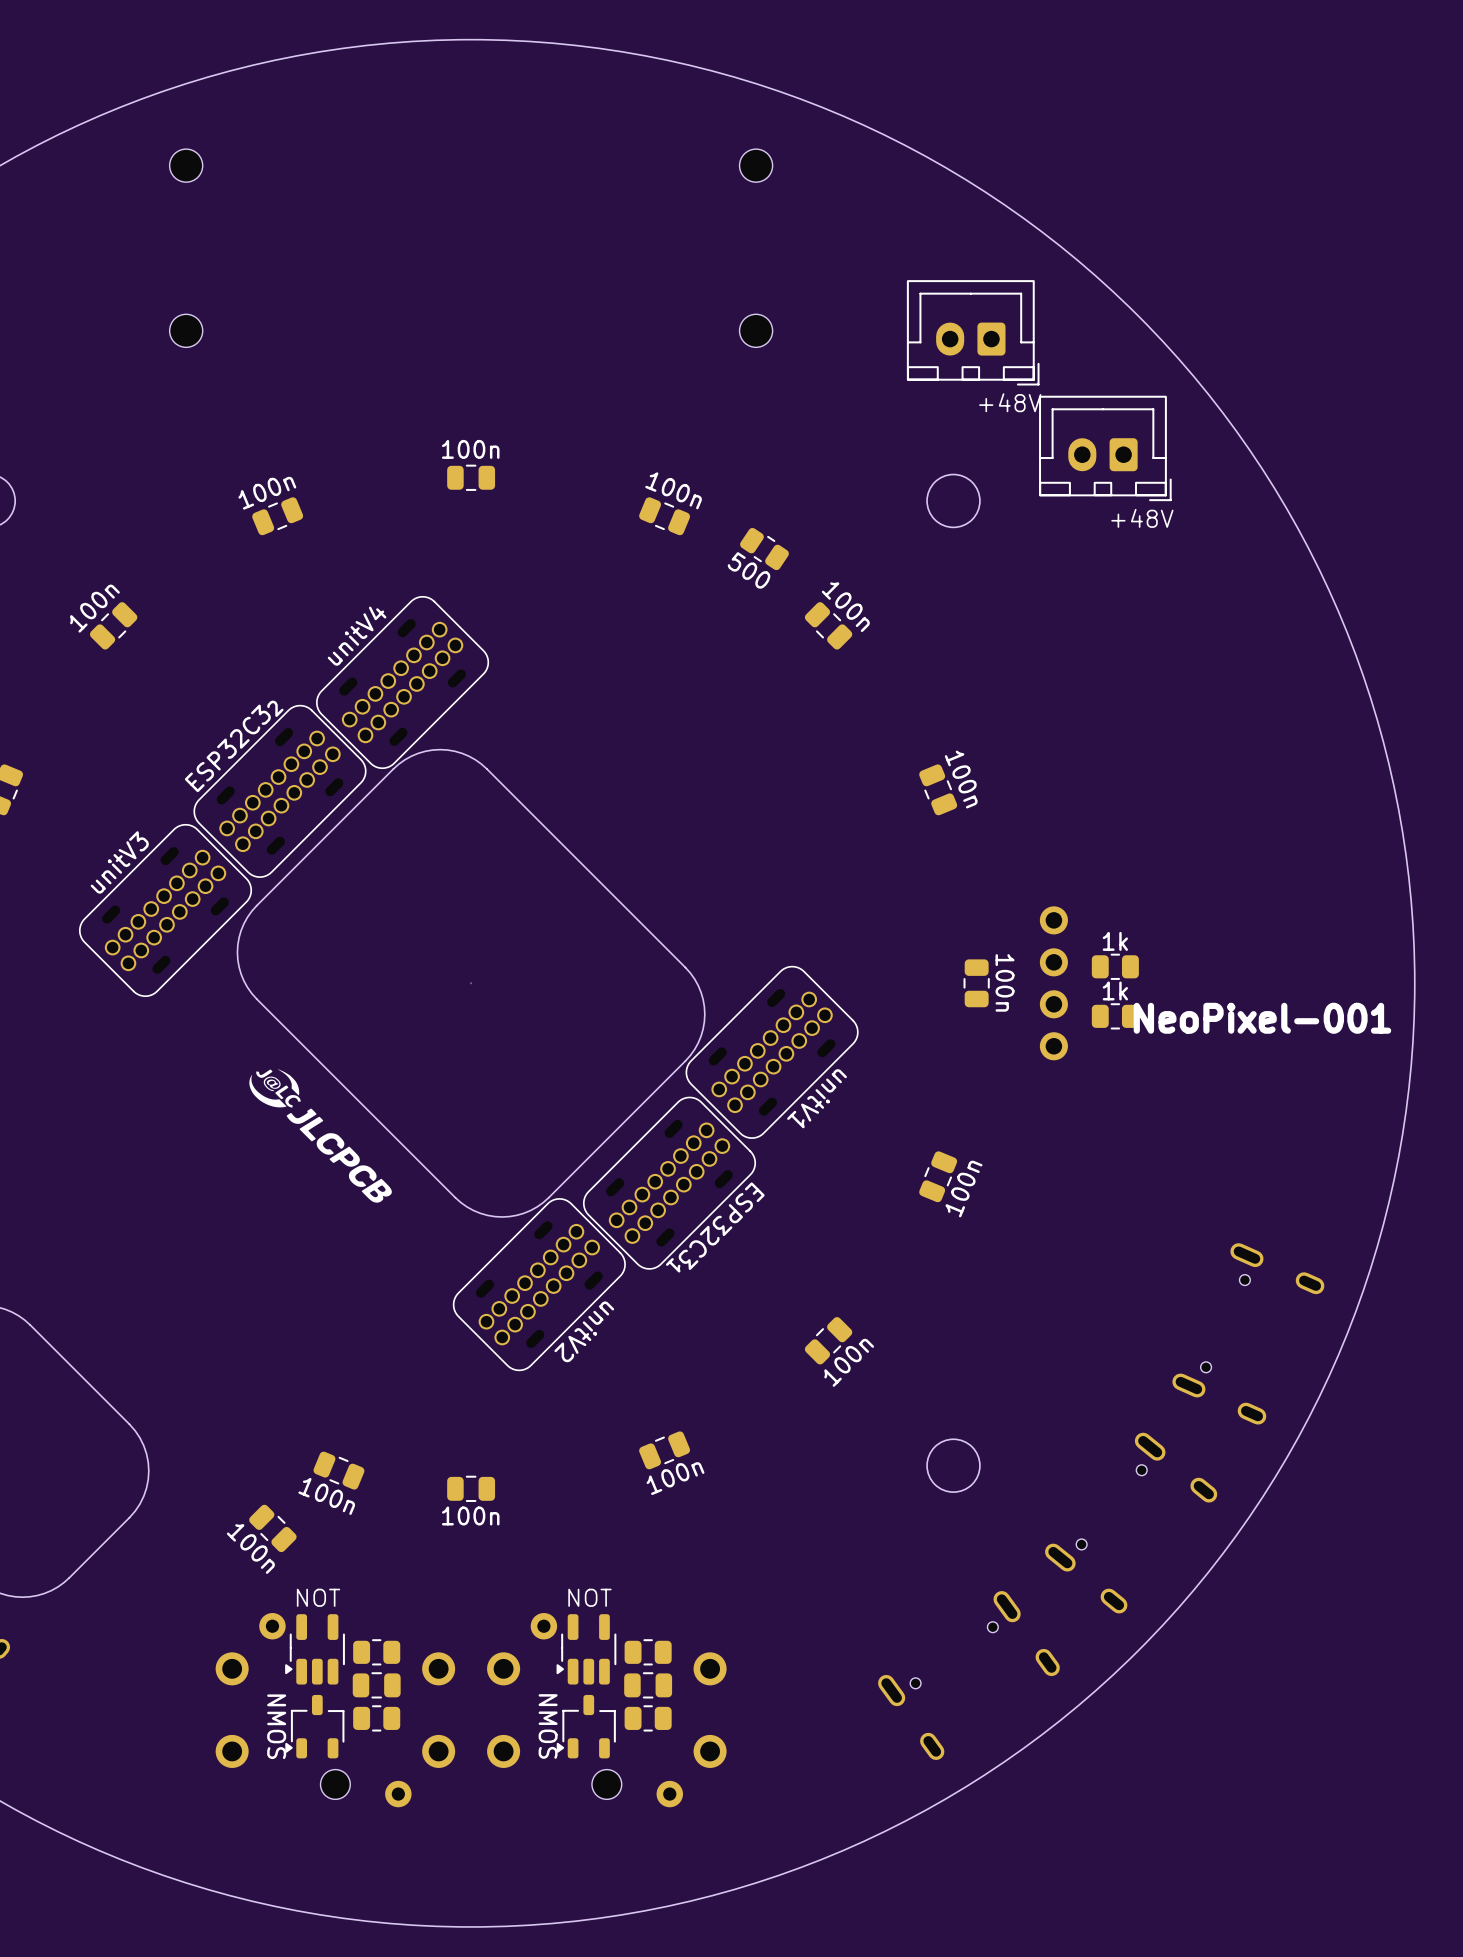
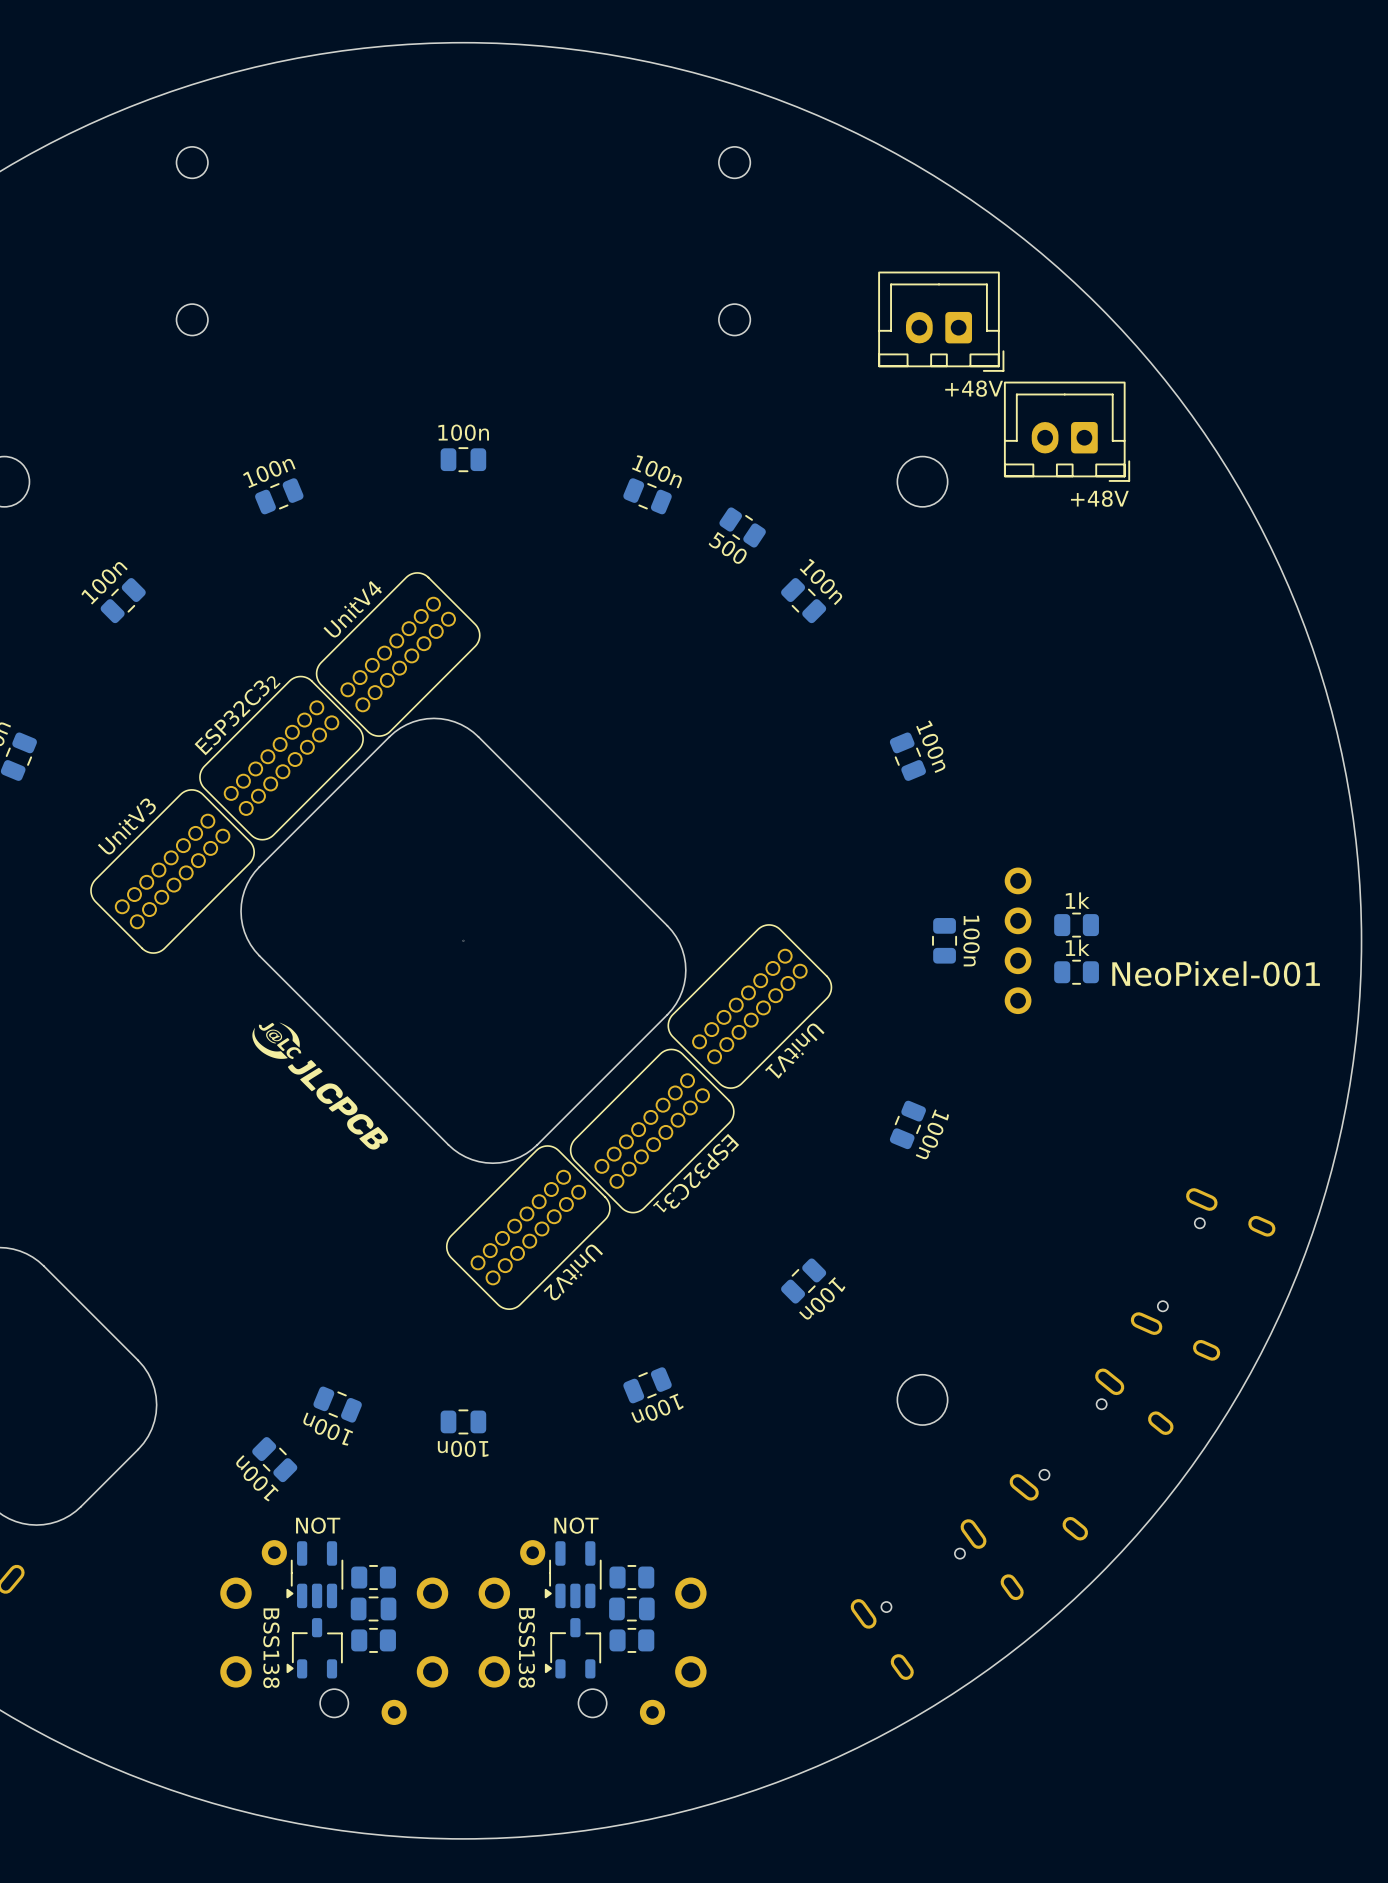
part value: unitV4 (357, 636) -> UnitV4 (352, 609)
part value: unitV3 (119, 862) -> UnitV3 (126, 826)
part value: unitV1 (817, 1098) -> UnitV1 (794, 1051)
part value rotation: 0° (963, 1189) -> 180° (932, 1134)
part value: unitV2 (584, 1331) -> UnitV2 (573, 1272)
part value rotation: 0° (849, 1362) -> 180° (822, 1298)
part value rotation: 0° (675, 1478) -> 180° (657, 1408)
part value rotation: 0° (326, 1496) -> 180° (328, 1429)
part value rotation: 0° (470, 1515) -> 180° (463, 1448)
part value rotation: 0° (250, 1549) -> 180° (257, 1478)
part value: NMOS (276, 1726) -> BSS138 (271, 1648)
part value: NMOS (548, 1726) -> BSS138 (526, 1648)

